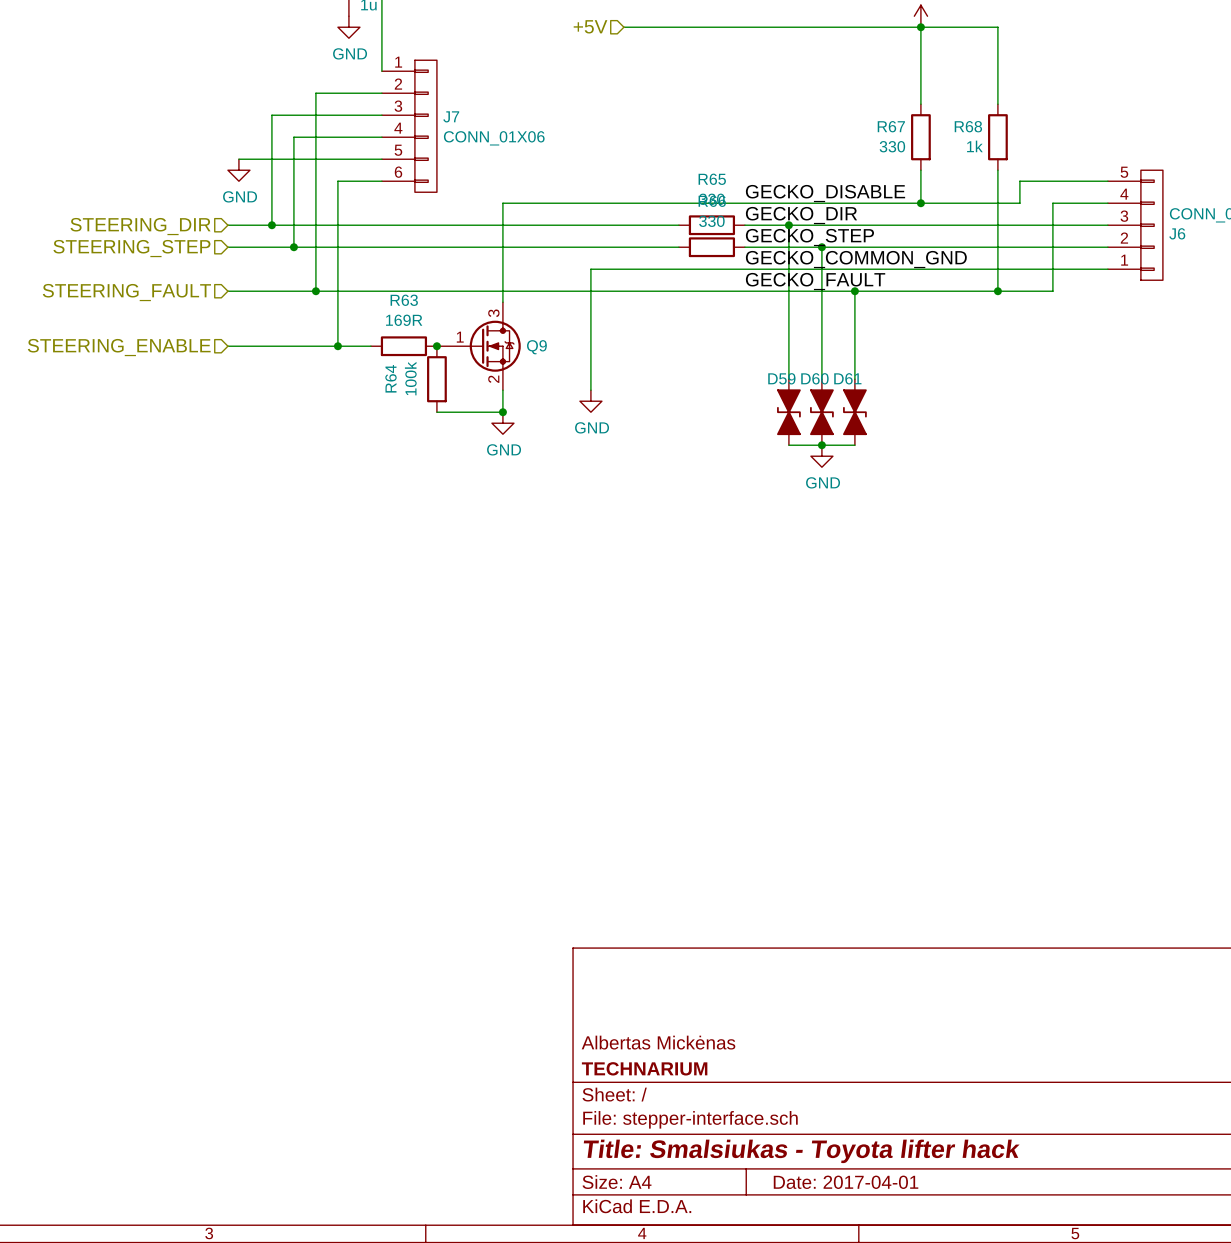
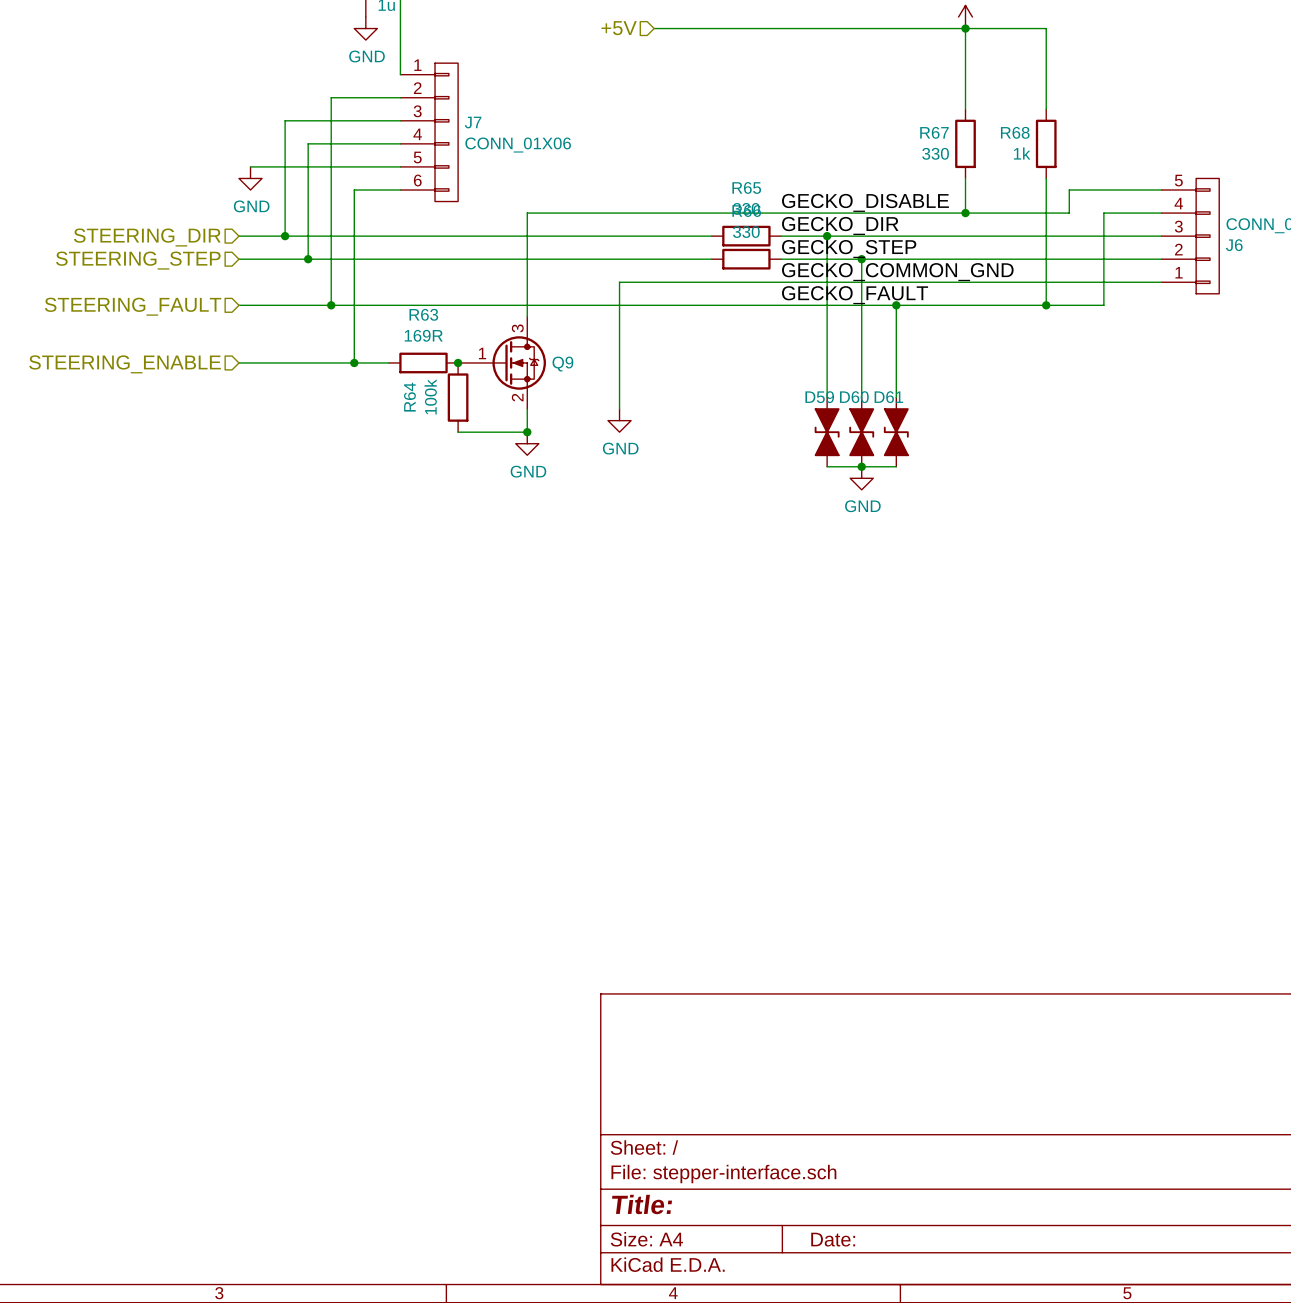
title block: Albertas Mickėnas (658, 1042) -> none
title block: TECHNARIUM (644, 1068) -> none
title block: Title: Smalsiukas - Toyota lifter hack (801, 1151) -> Title: (642, 1204)
title block: Date: 2017-04-01 (846, 1182) -> Date: (833, 1239)

